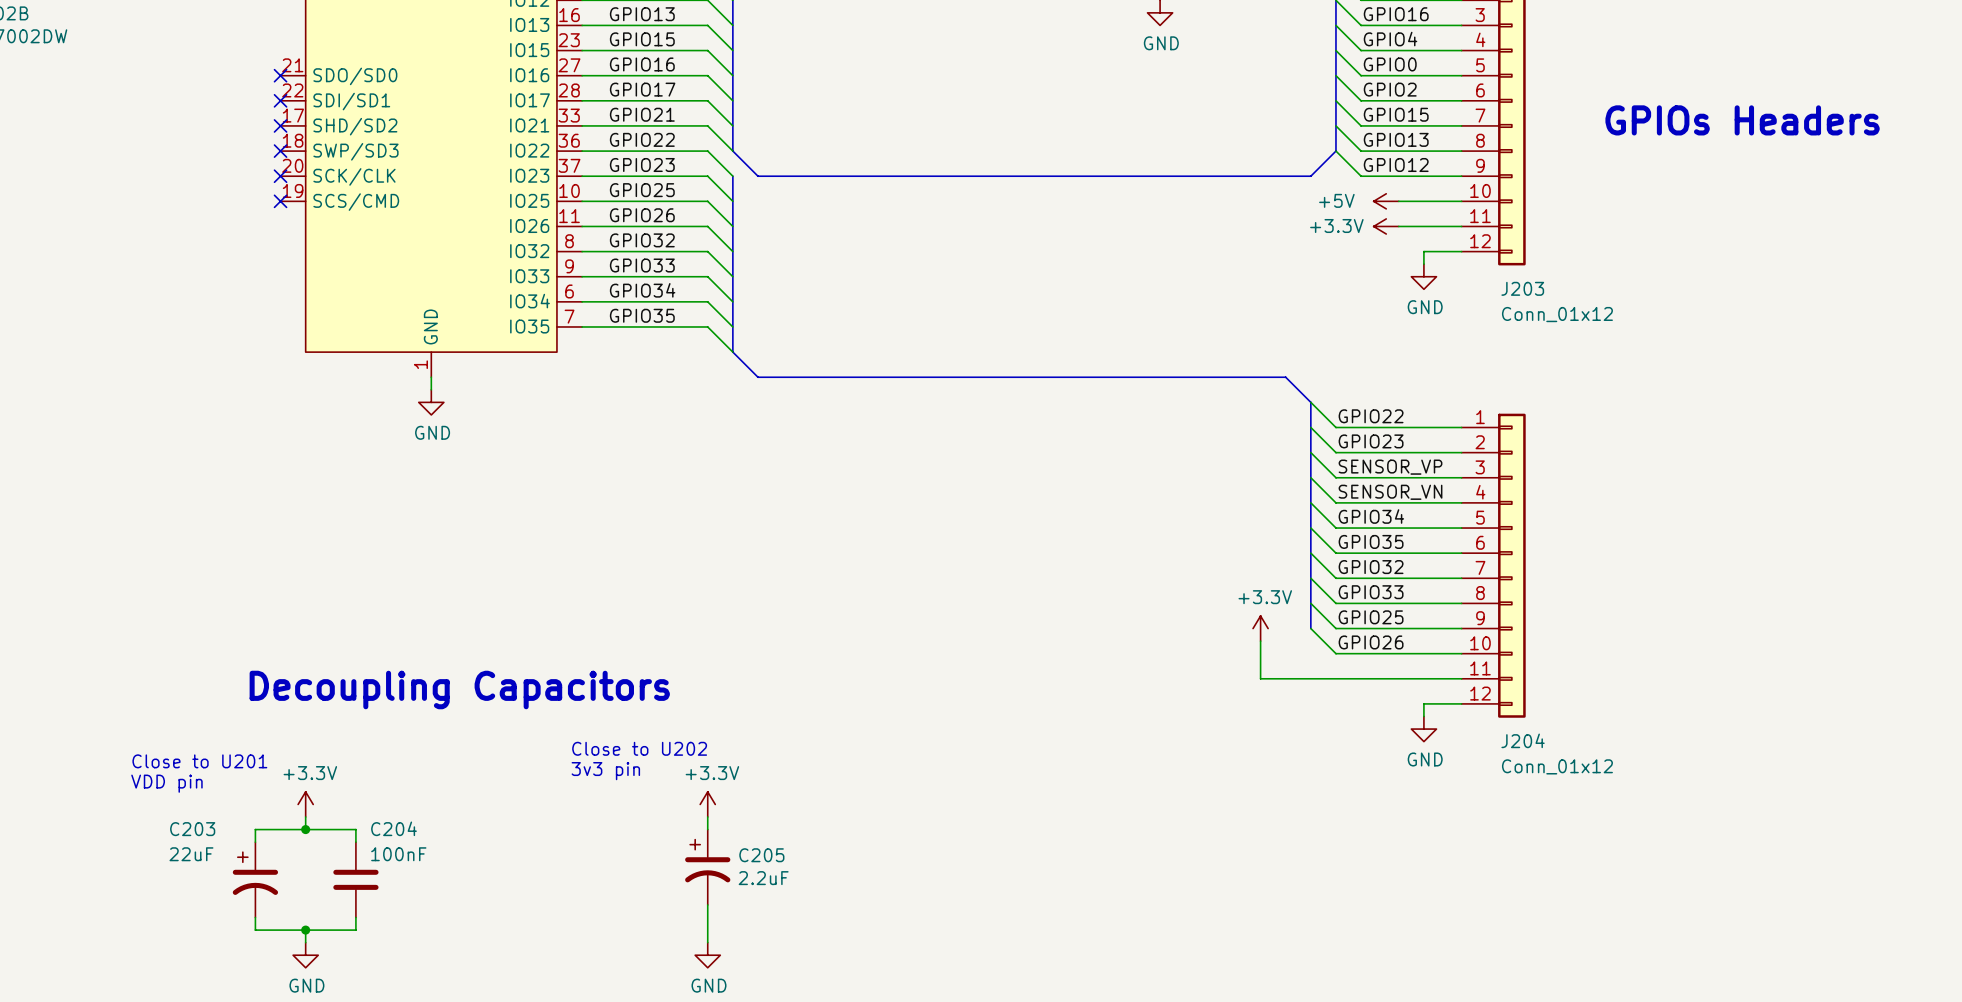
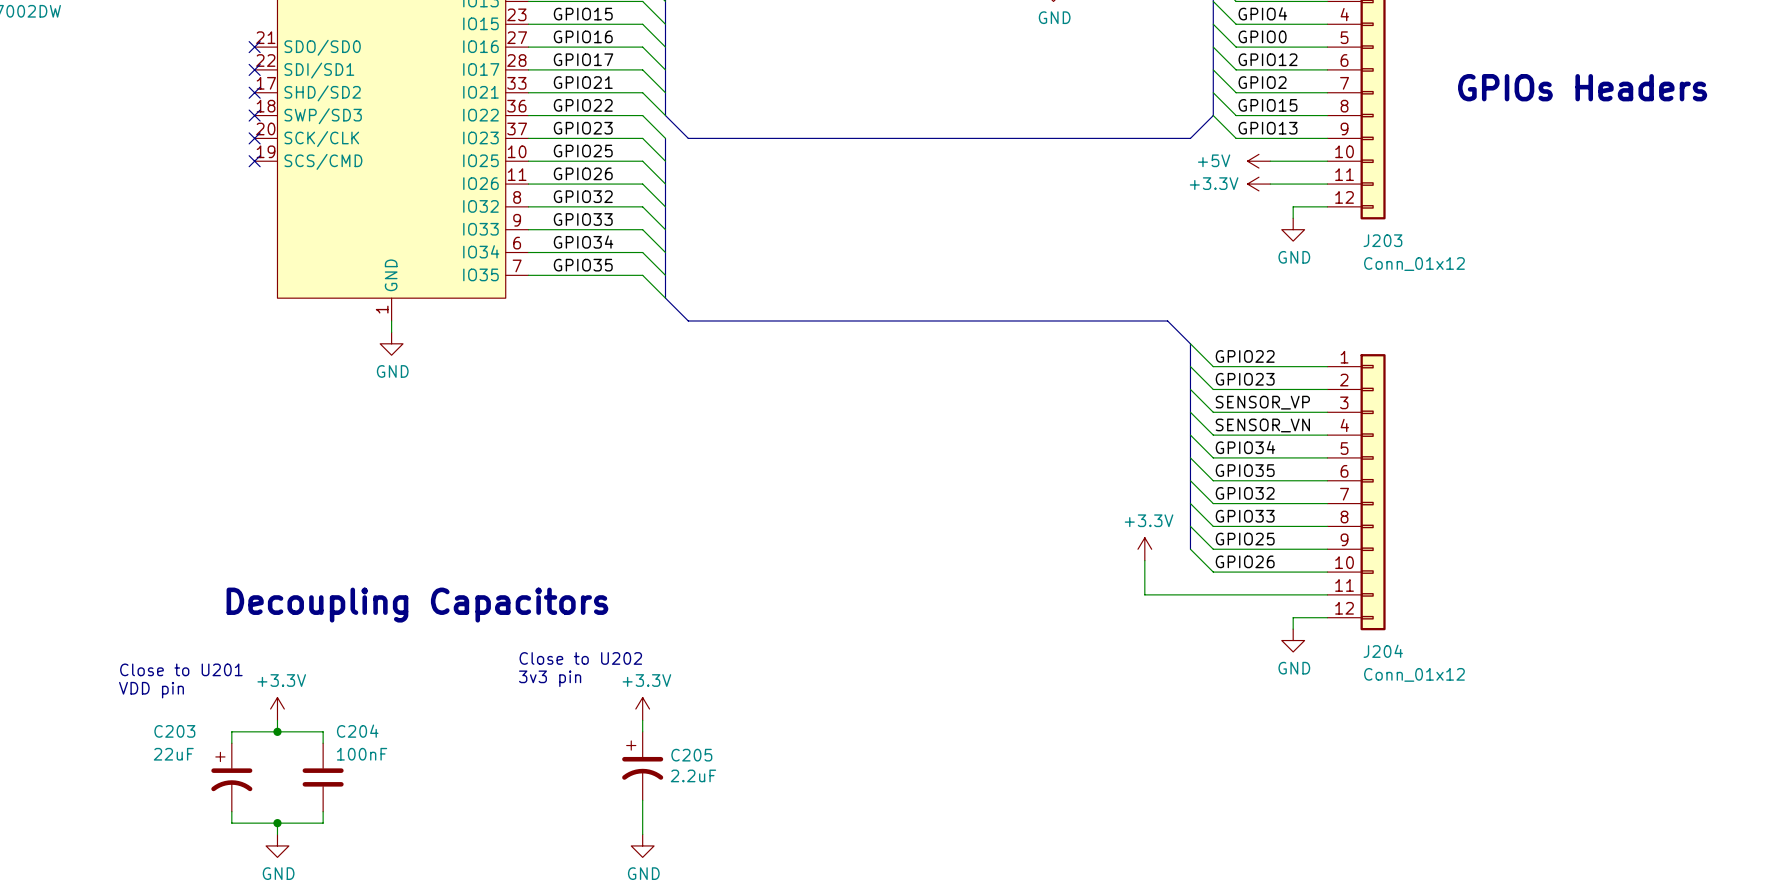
label: GPIO2 (1390, 89) -> GPIO12 (1268, 59)
label: GPIO15 (1396, 114) -> GPIO2 (1262, 82)
label: GPIO13 (1396, 139) -> GPIO15 (1268, 105)
label: GPIO12 (1396, 165) -> GPIO13 (1268, 128)

